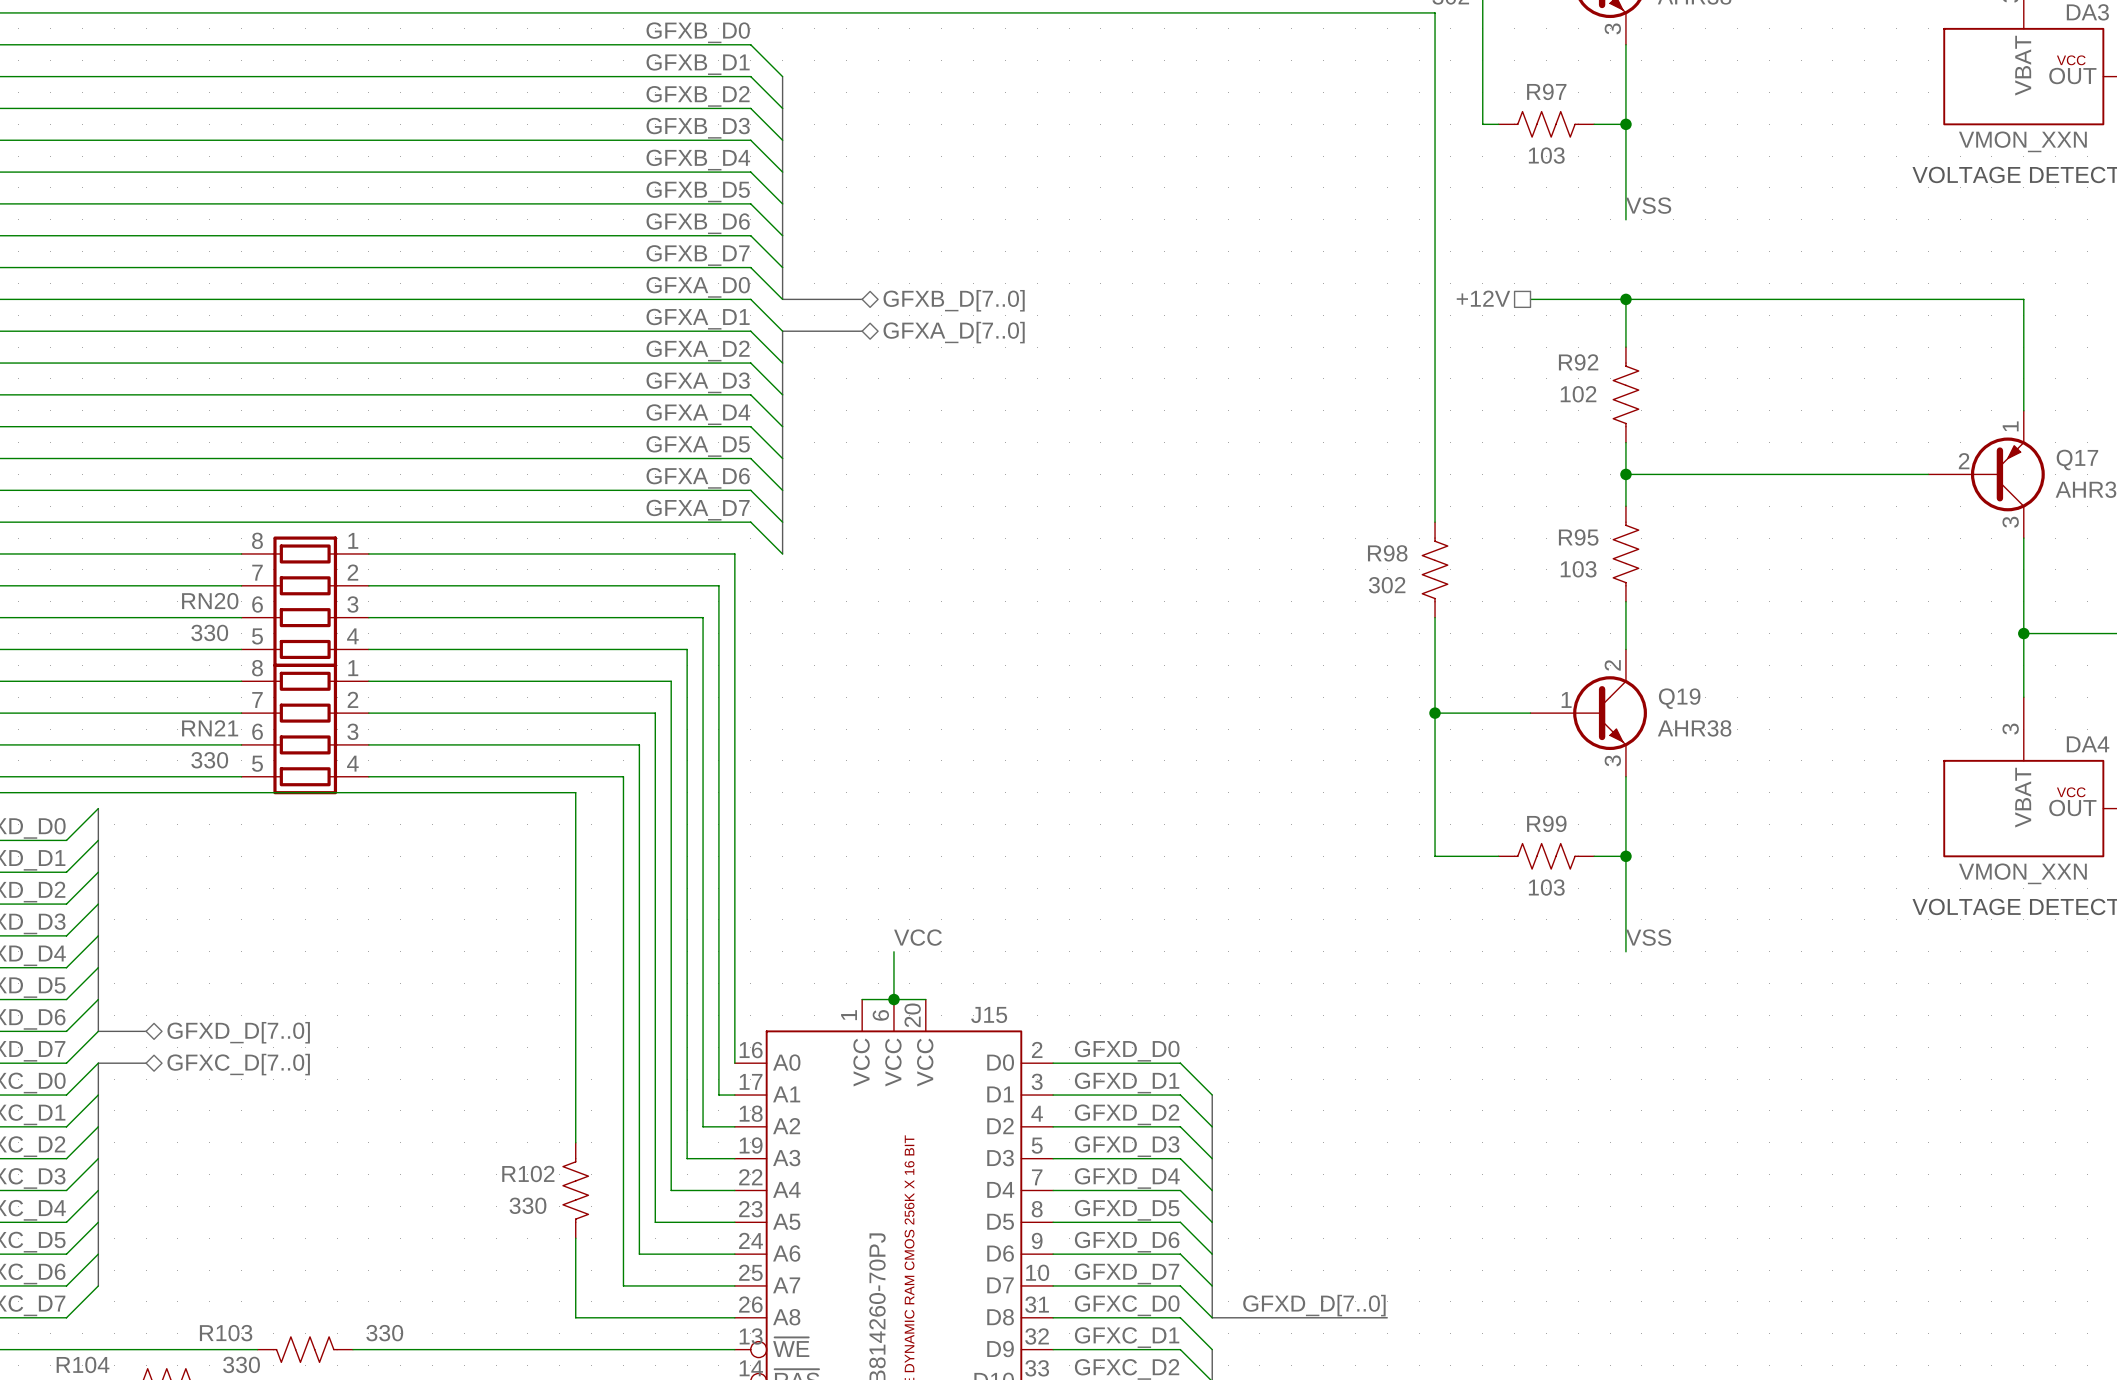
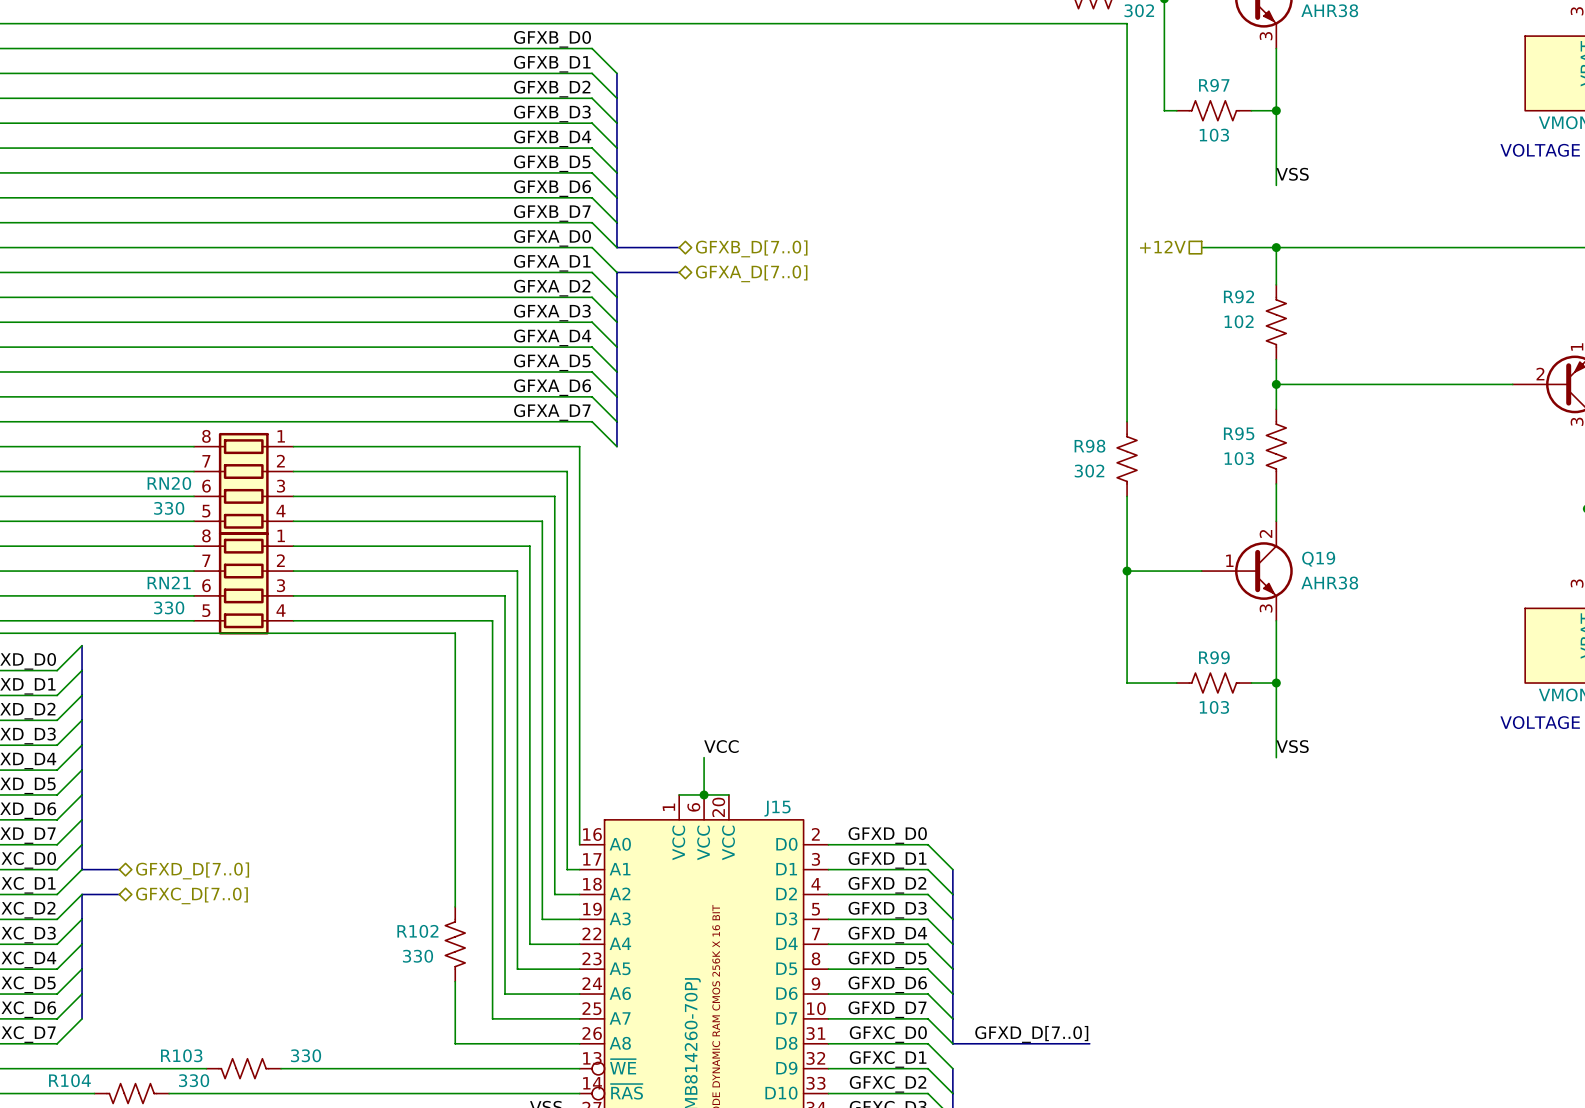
bus: (98, 1031) (146, 1031) -> (82, 819) (82, 844)
hierarchical label position: GFXD_D[7..0] (238, 1032) -> GFXD_D[7..0] (192, 870)
bus: (98, 1063) (146, 1063) -> (82, 894) (119, 894)
hierarchical label position: GFXC_D[7..0] (238, 1064) -> GFXC_D[7..0] (191, 895)
bus: (98, 1095) (98, 1126) -> (82, 869) (119, 869)

